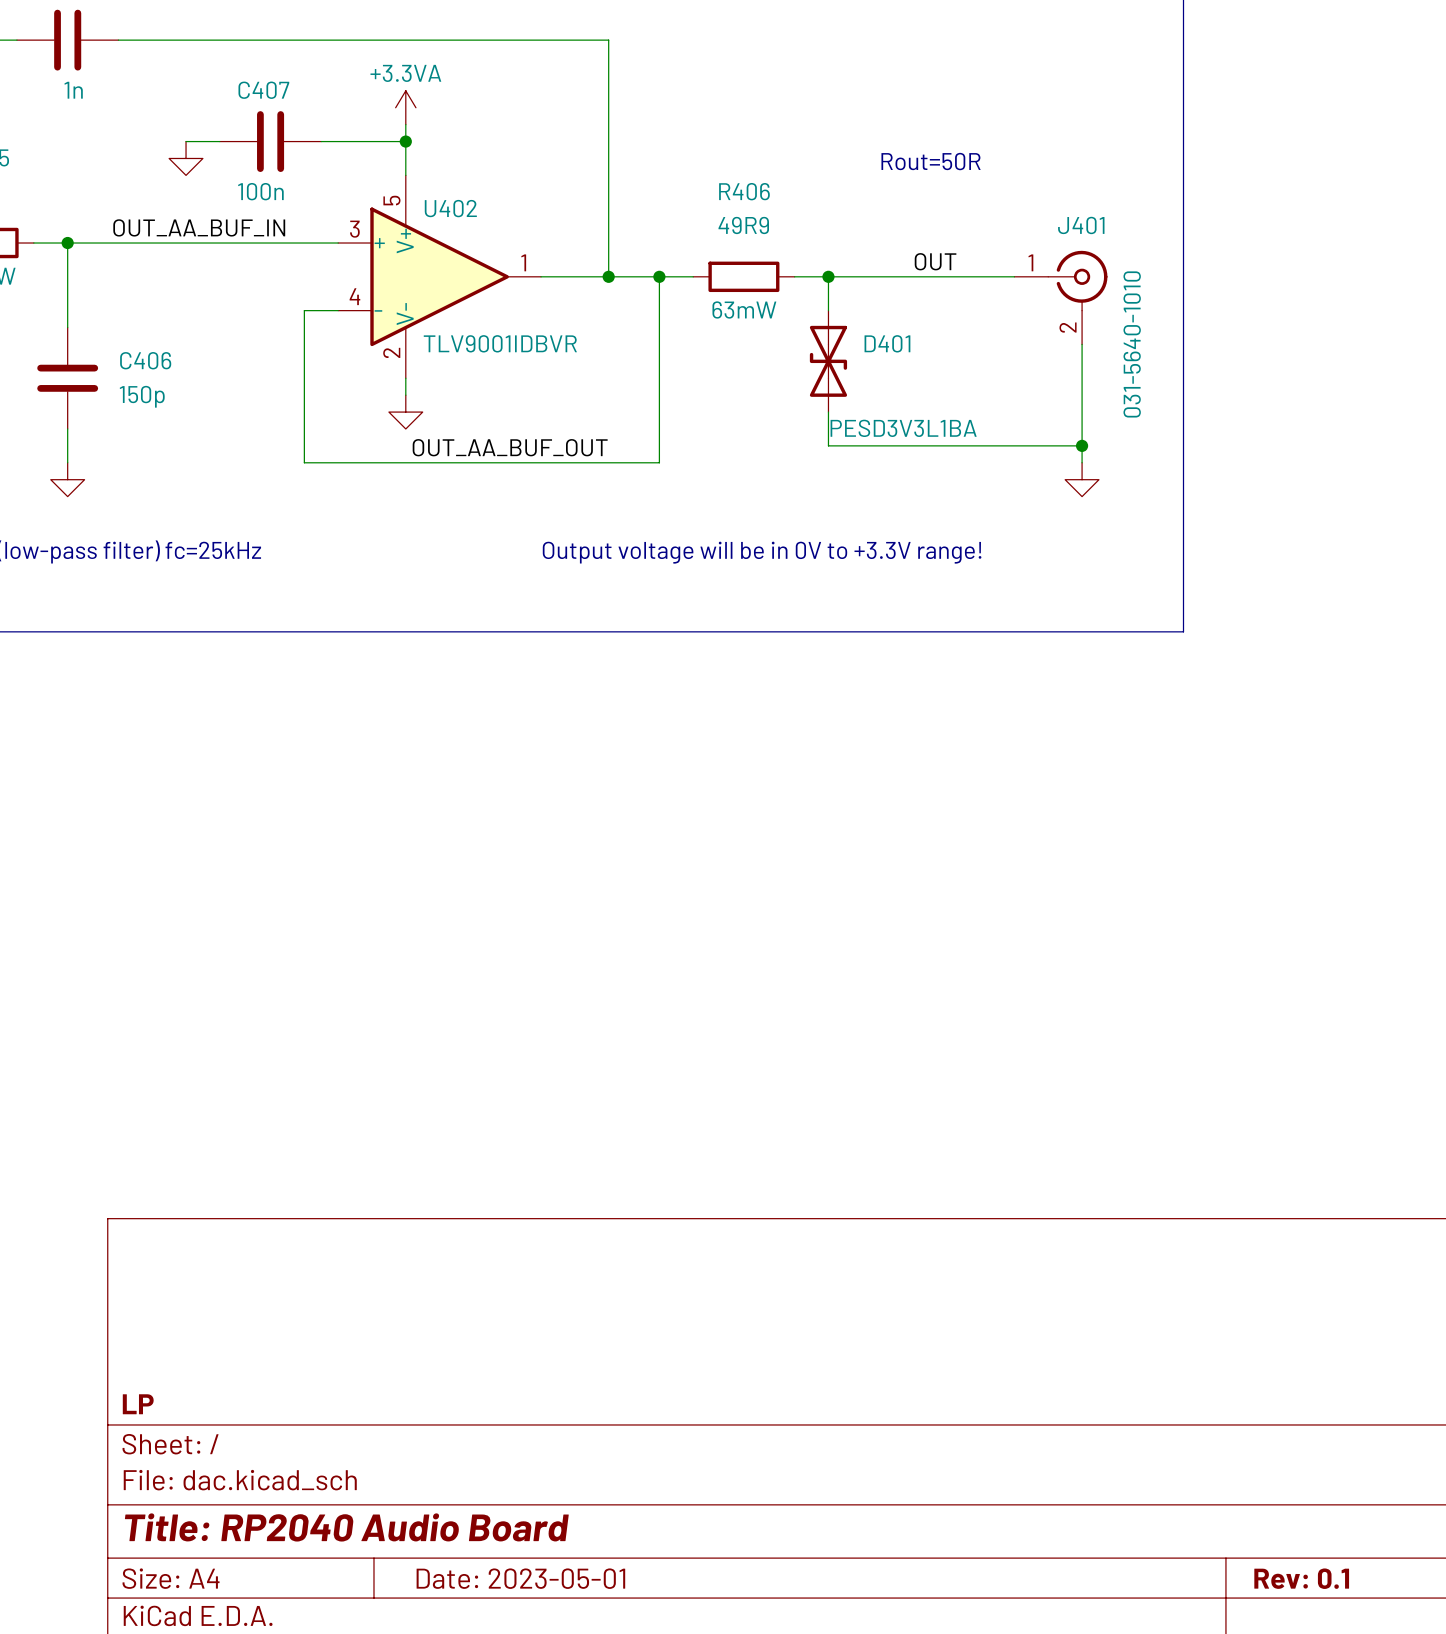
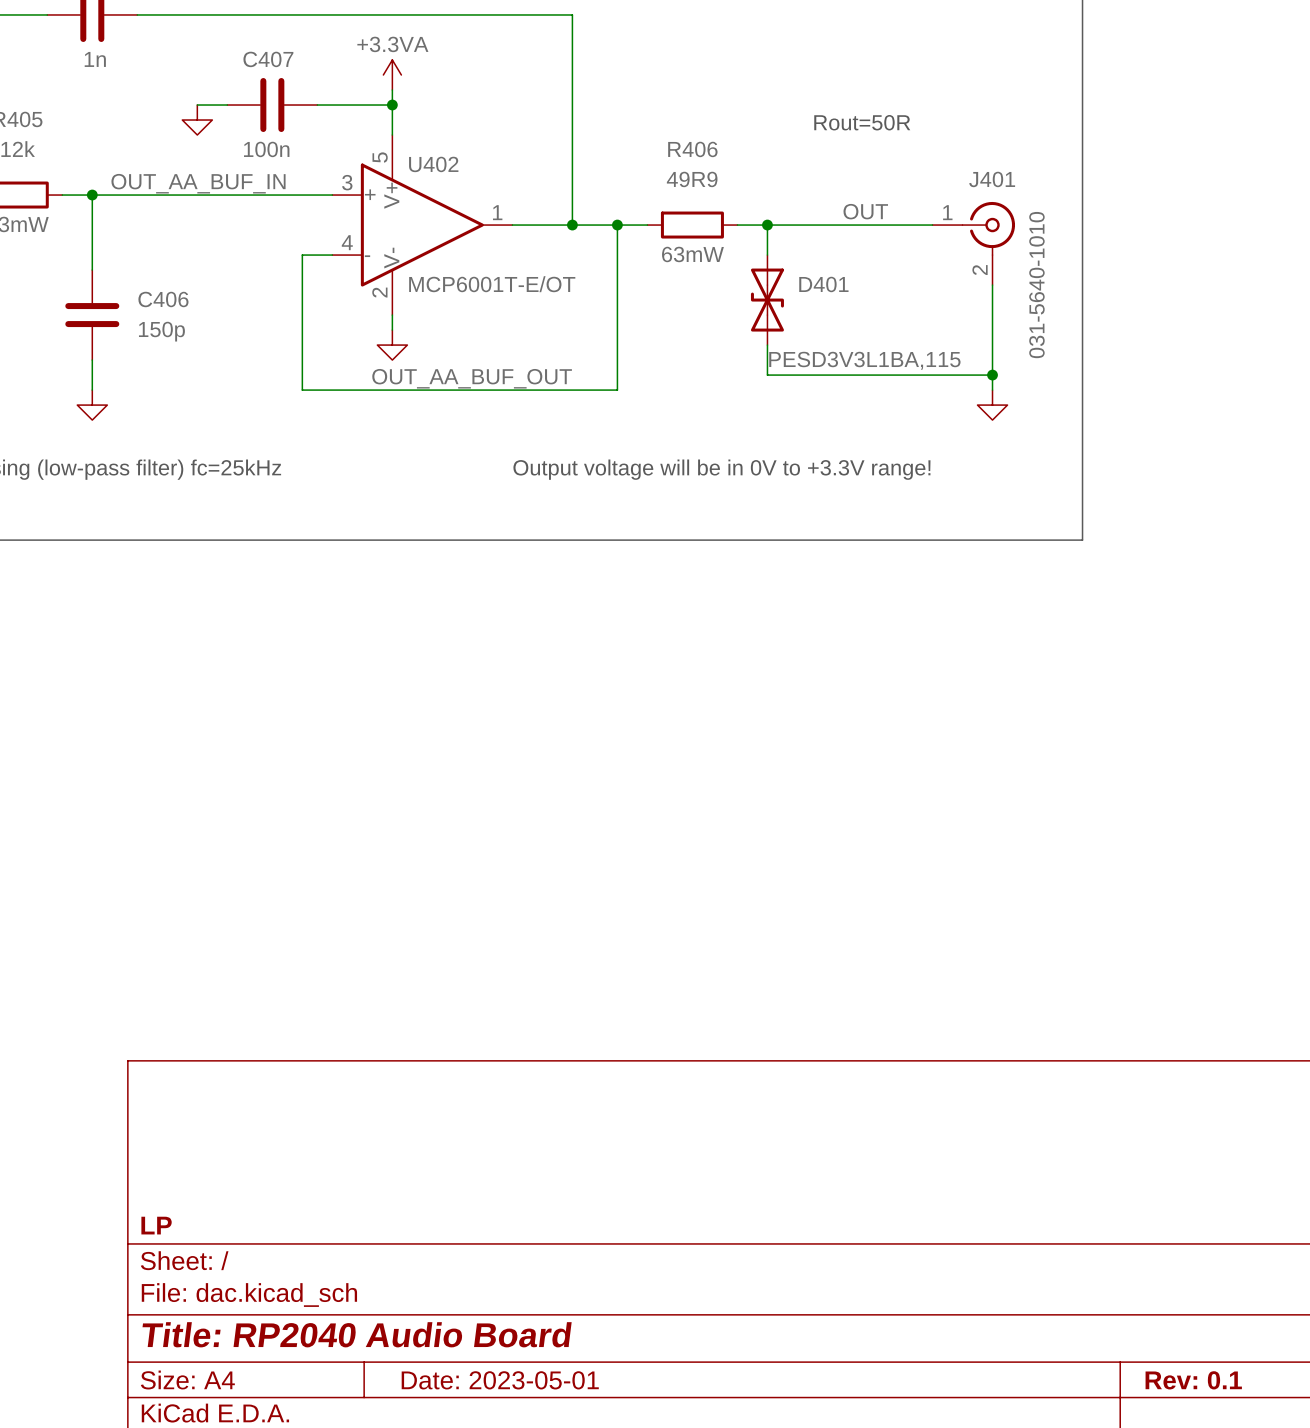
U402 value: TLV9001IDBVR (500, 343) -> MCP6001T-E/OT (492, 284)
D401 value: PESD3V3L1BA (903, 428) -> PESD3V3L1BA,115 (864, 360)

